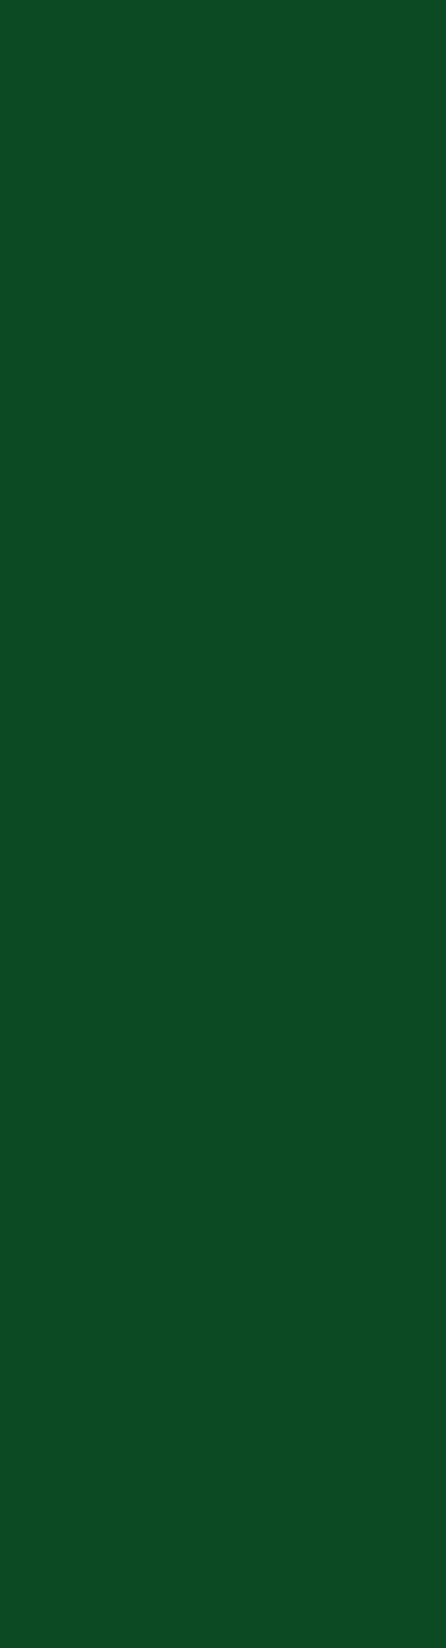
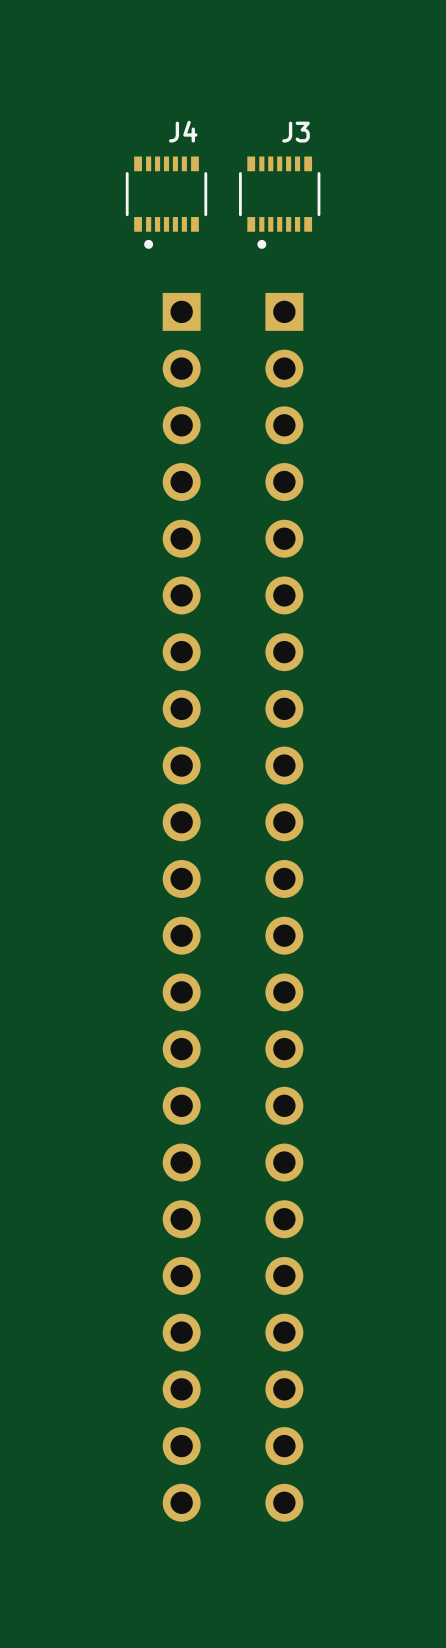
J4: none -> (166, 202)
J3: none -> (279, 202)
part: none -> (181, 907)
part: none -> (284, 907)

